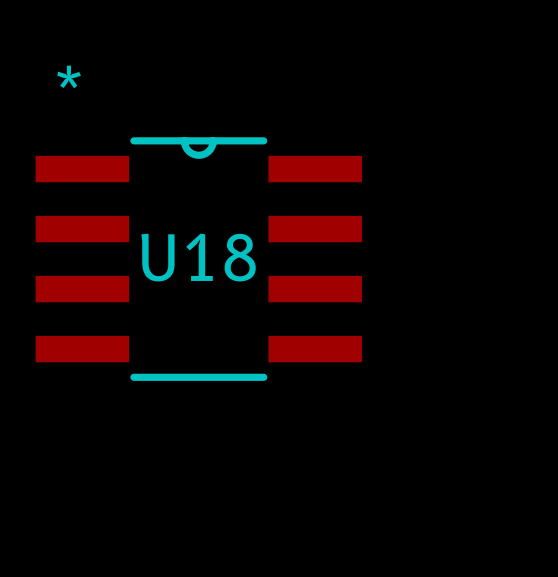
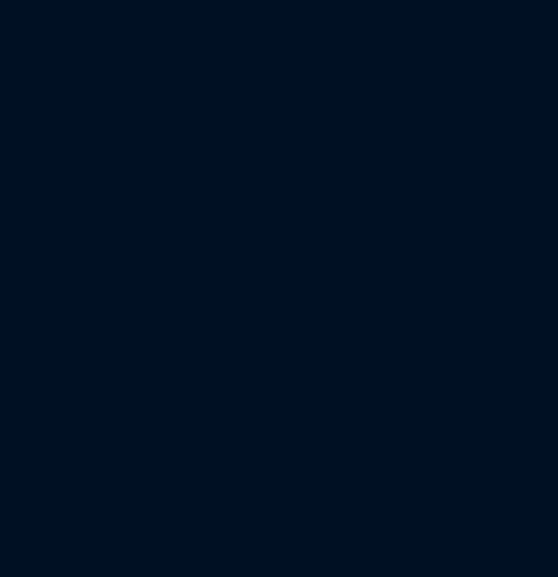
U18: (198, 259) -> none

